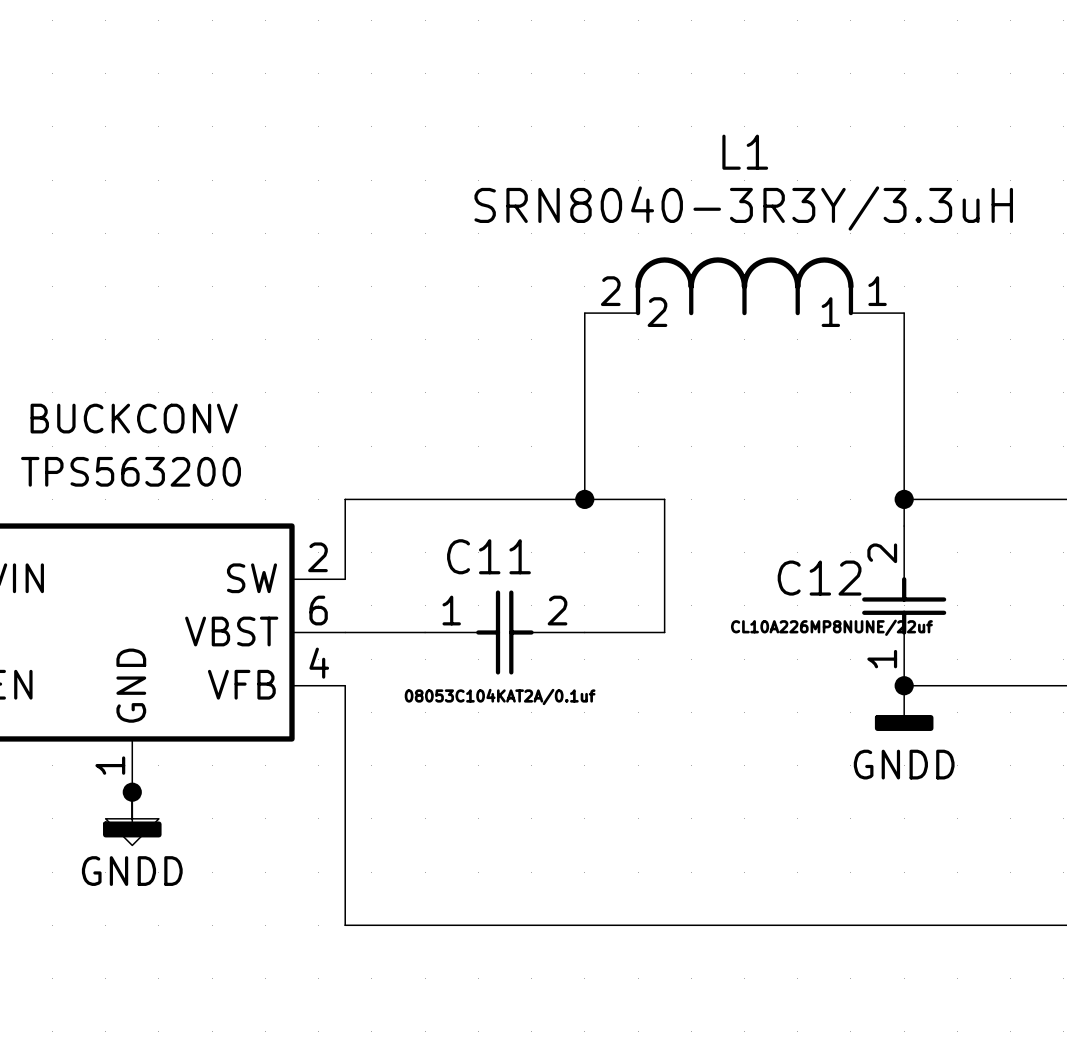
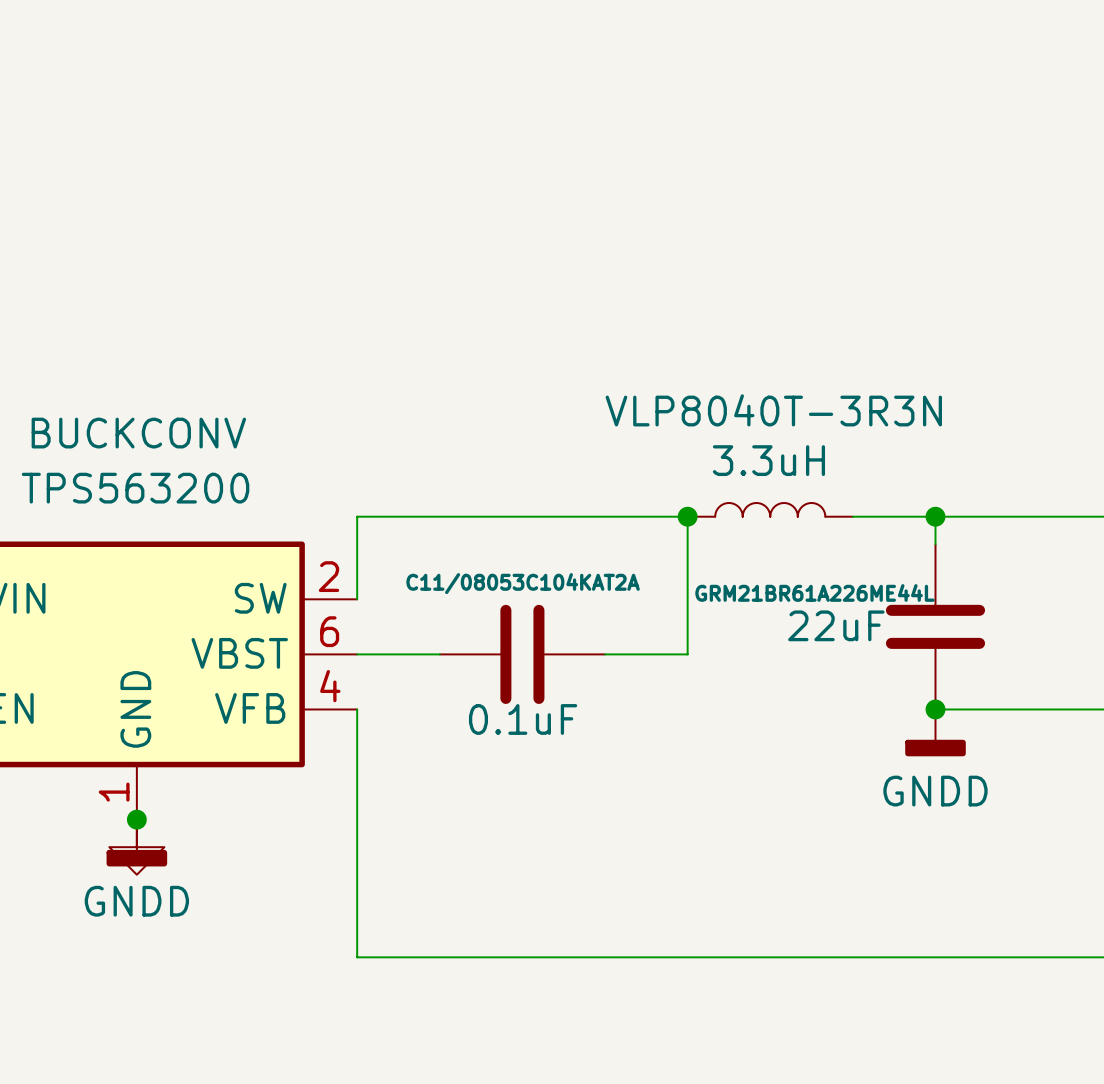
L1: SRN8040-3R3Y/3.3uH (744, 286) -> none
wire: (584, 313) (584, 499) -> none
wire: (904, 313) (904, 499) -> (852, 516) (935, 516)
VLP8040T-3R3N: none -> 3.3uH (770, 509)
junction position: (584, 499) -> (687, 516)
C12: CL10A226MP8NUNE/22uf (904, 605) -> none
GRM21BR61A226ME44L: none -> 22uF (935, 626)
C11: 08053C104KAT2A/0.1uf (504, 632) -> none
C11/08053C104KAT2A: none -> 0.1uF (522, 654)

